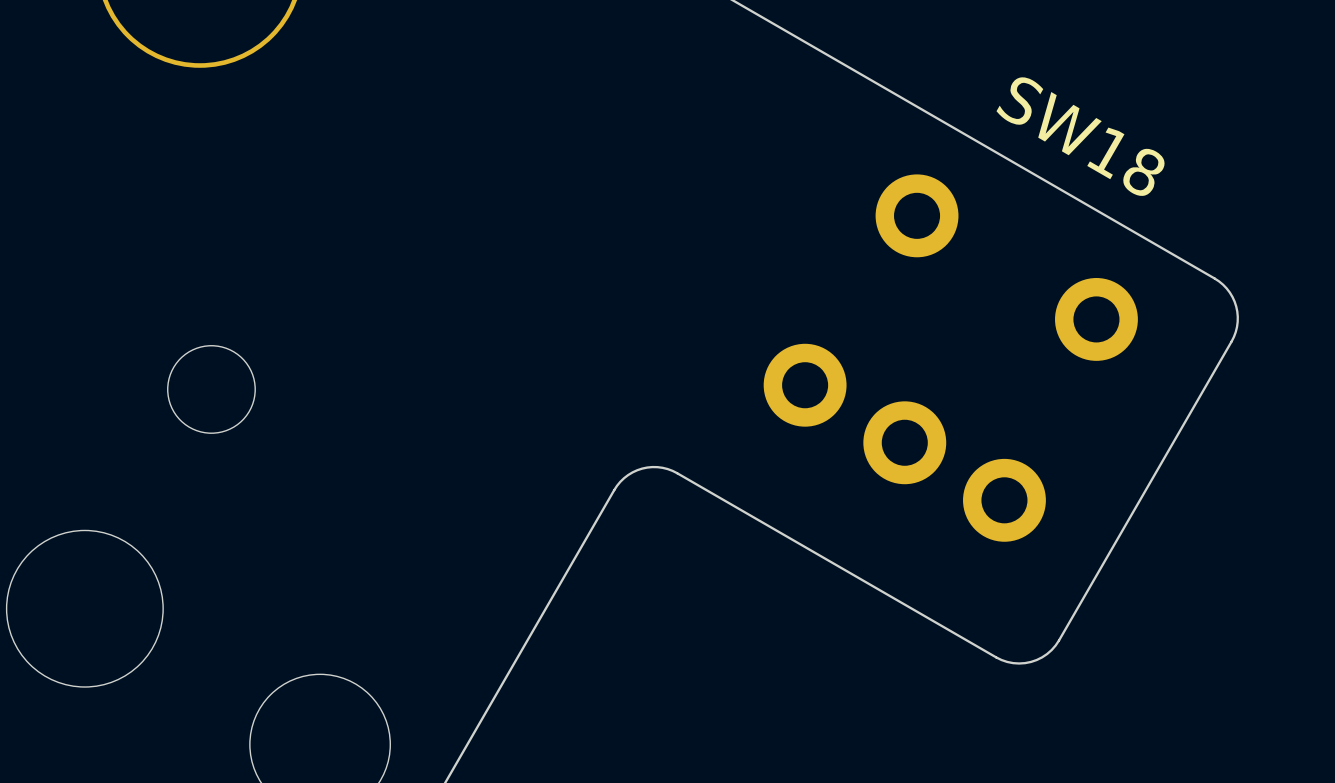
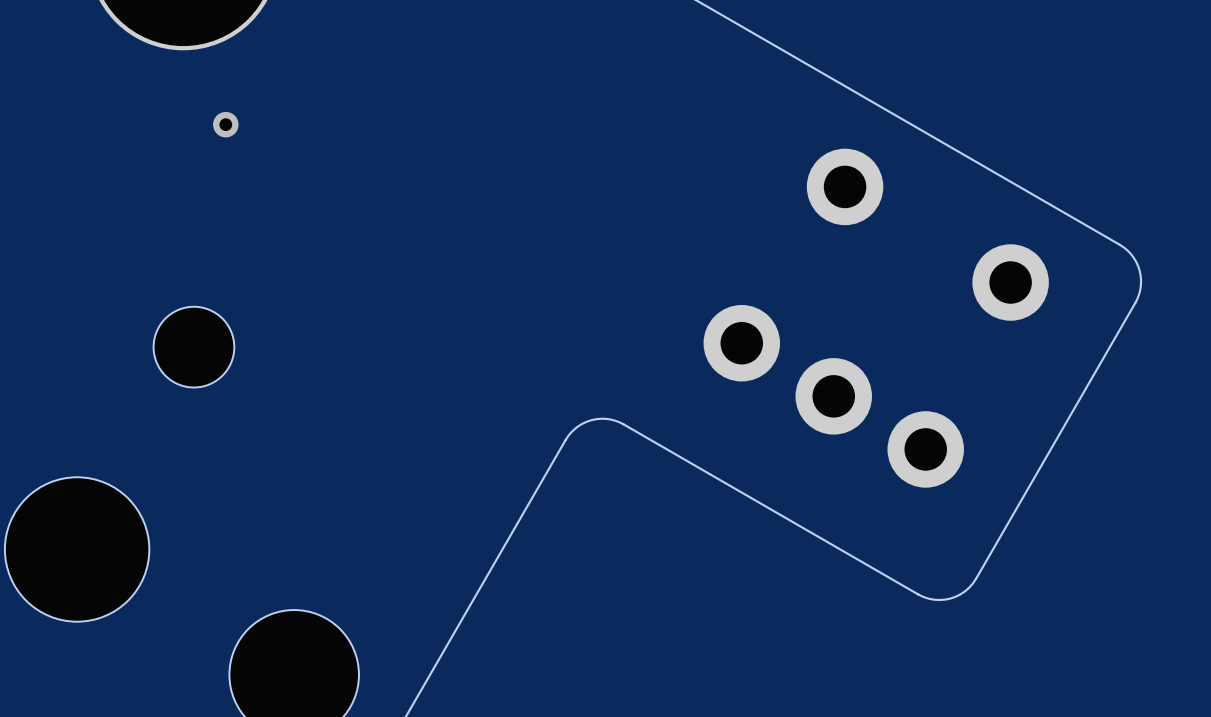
SW18 name: SW18 (1081, 136) -> none
via: none -> (225, 124)

